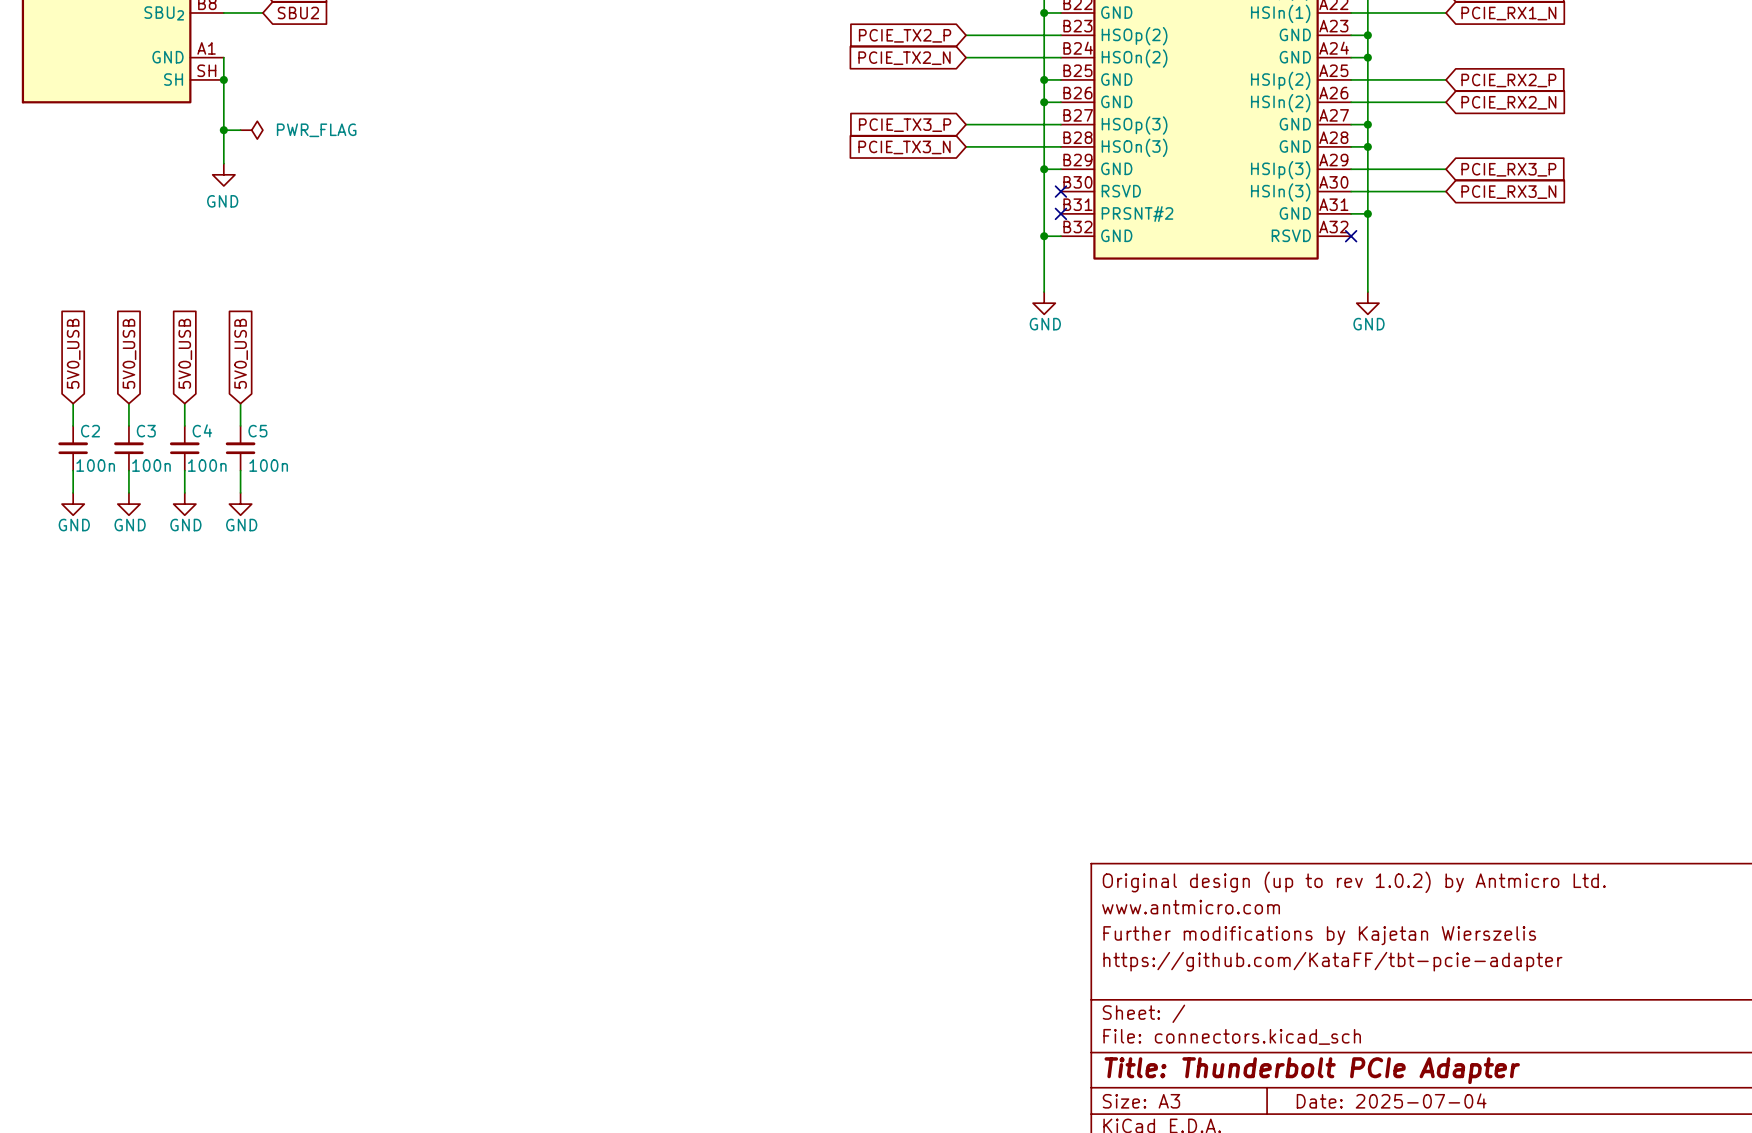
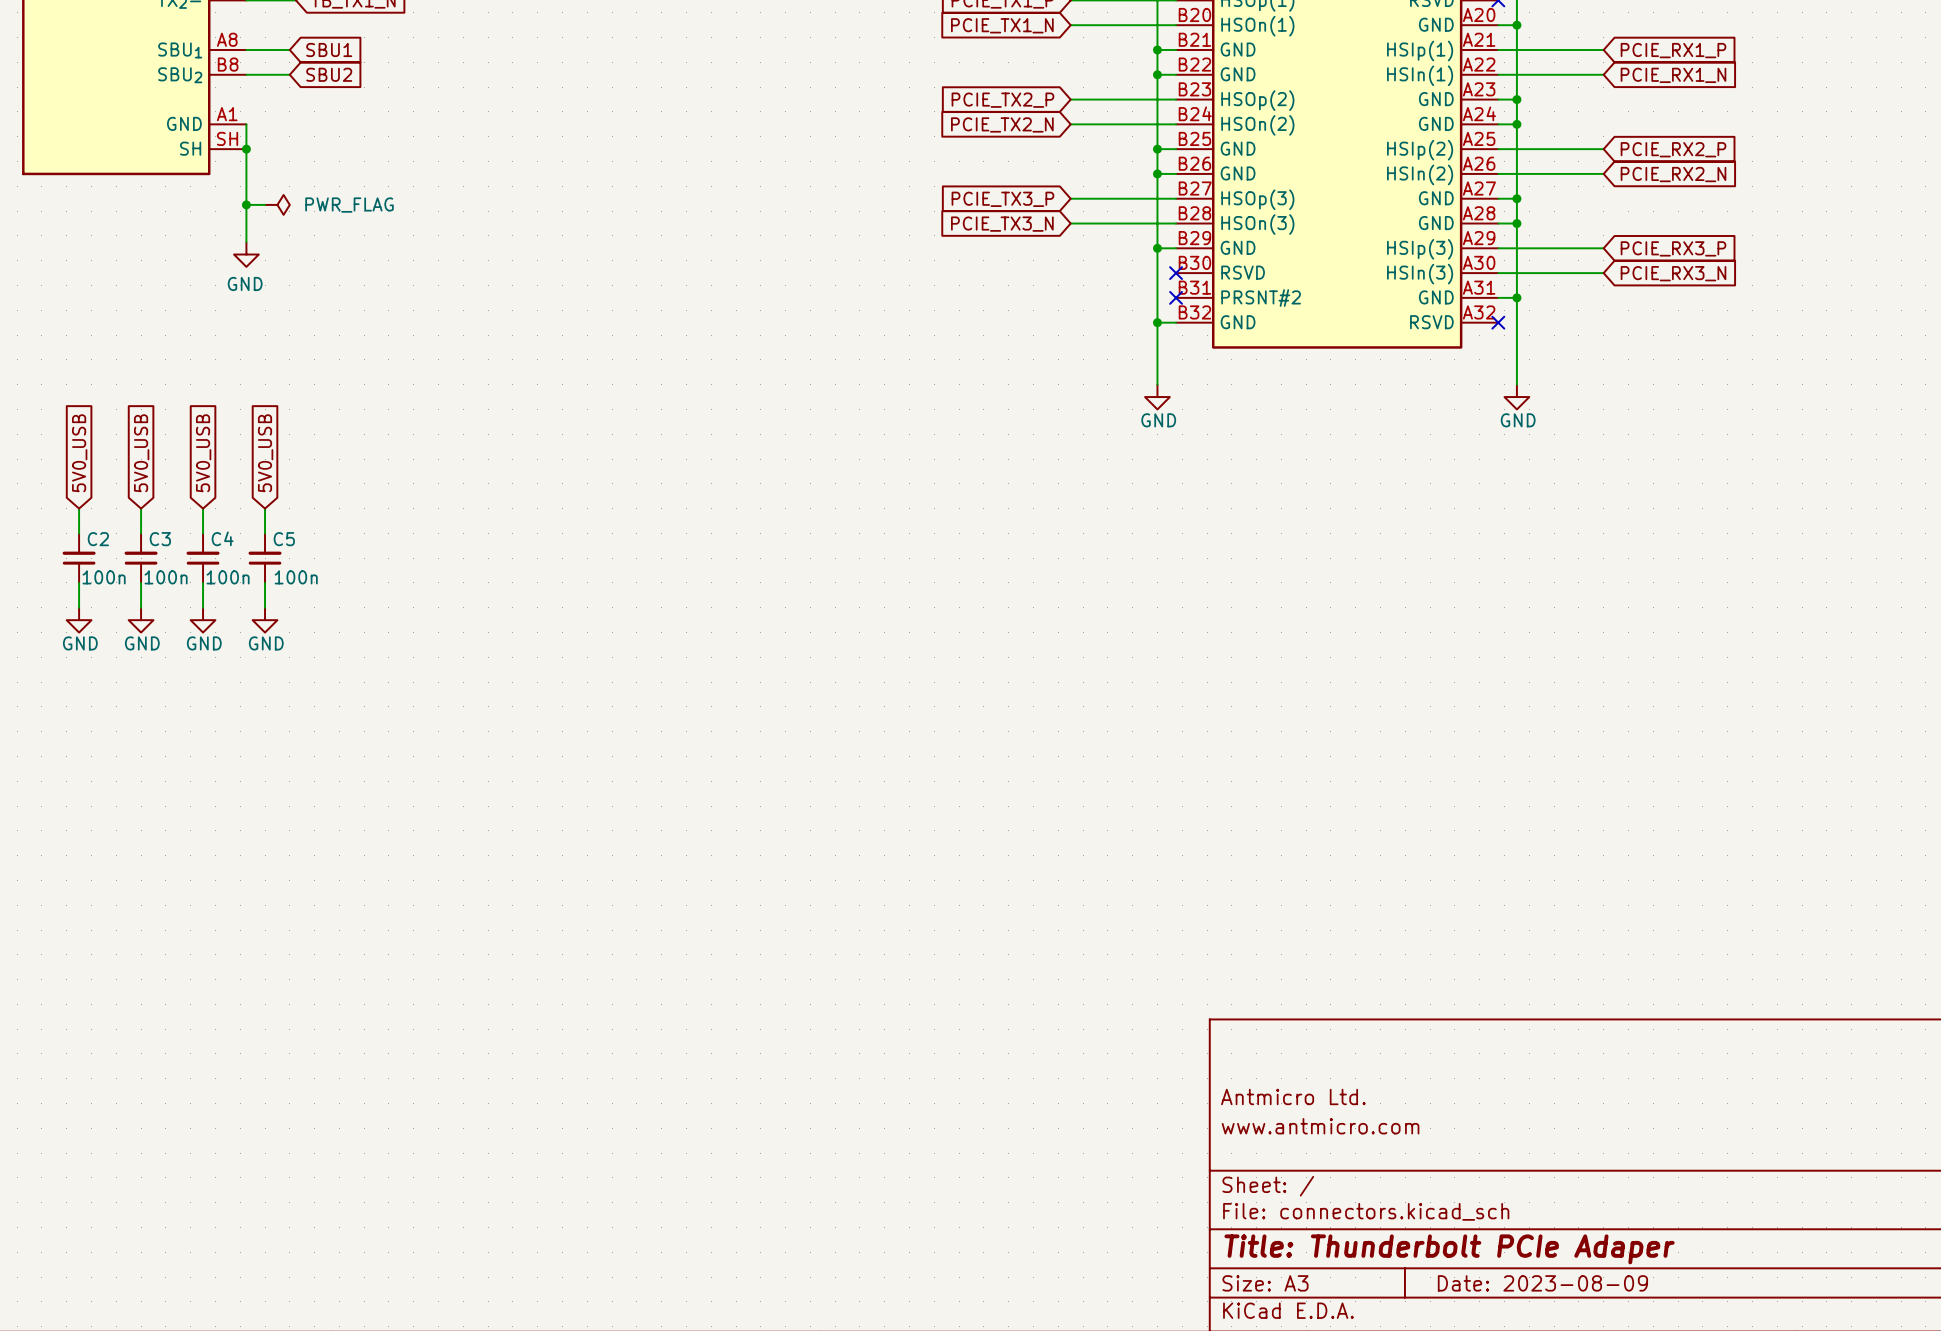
title block: Original design (up to rev 1.0.2) by Antmicro Ltd. (1354, 882) -> none
title block: www.antmicro.com (1191, 907) -> none
title block: Further modifications by Kajetan Wierszelis (1319, 935) -> Antmicro Ltd. (1293, 1096)
title block: https://github.com/KataFF/tbt-pcie-adapter (1332, 961) -> www.antmicro.com (1320, 1126)
title block: Title: Thunderbolt PCIe Adapter (1312, 1070) -> Title: Thunderbolt PCIe Adaper (1449, 1249)
title block: Date: 2025-07-04 (1391, 1100) -> Date: 2023-08-09 (1542, 1283)

